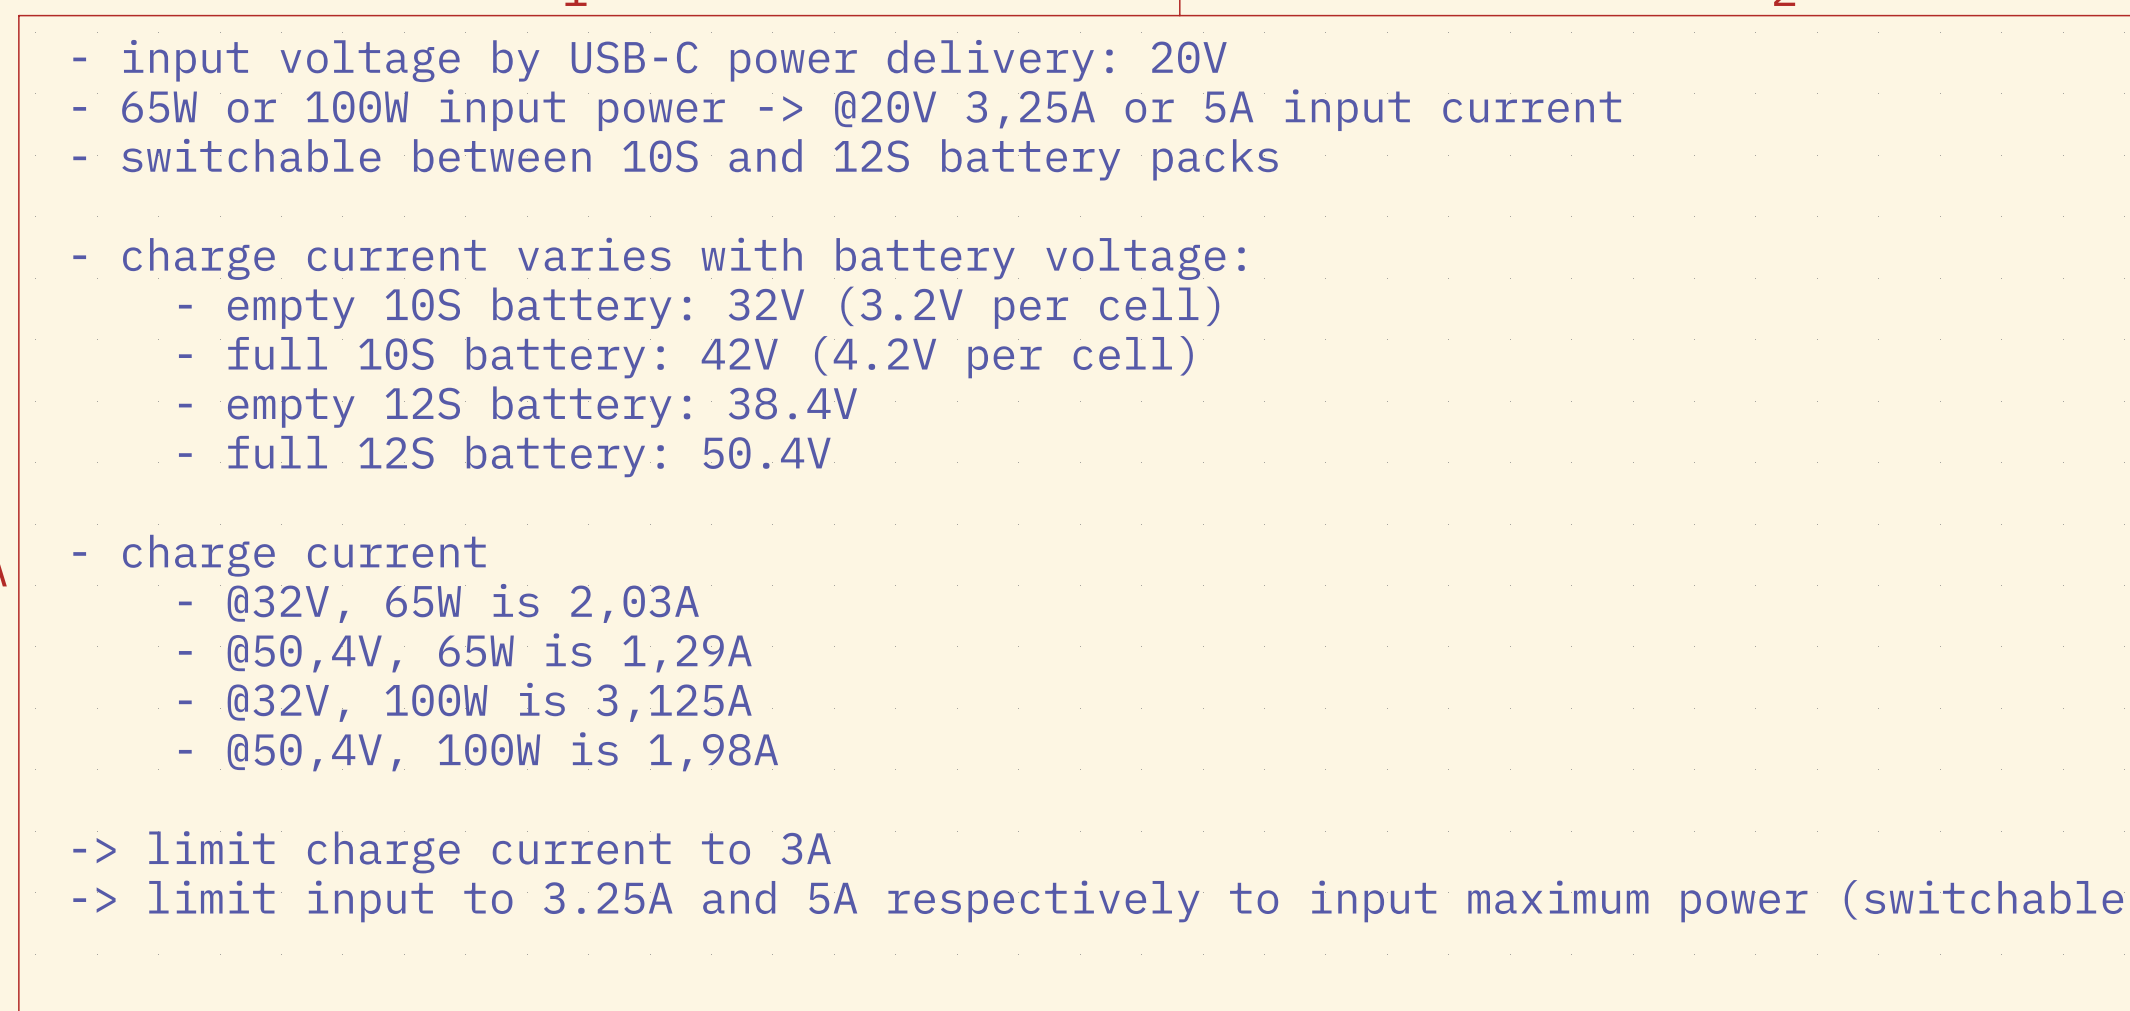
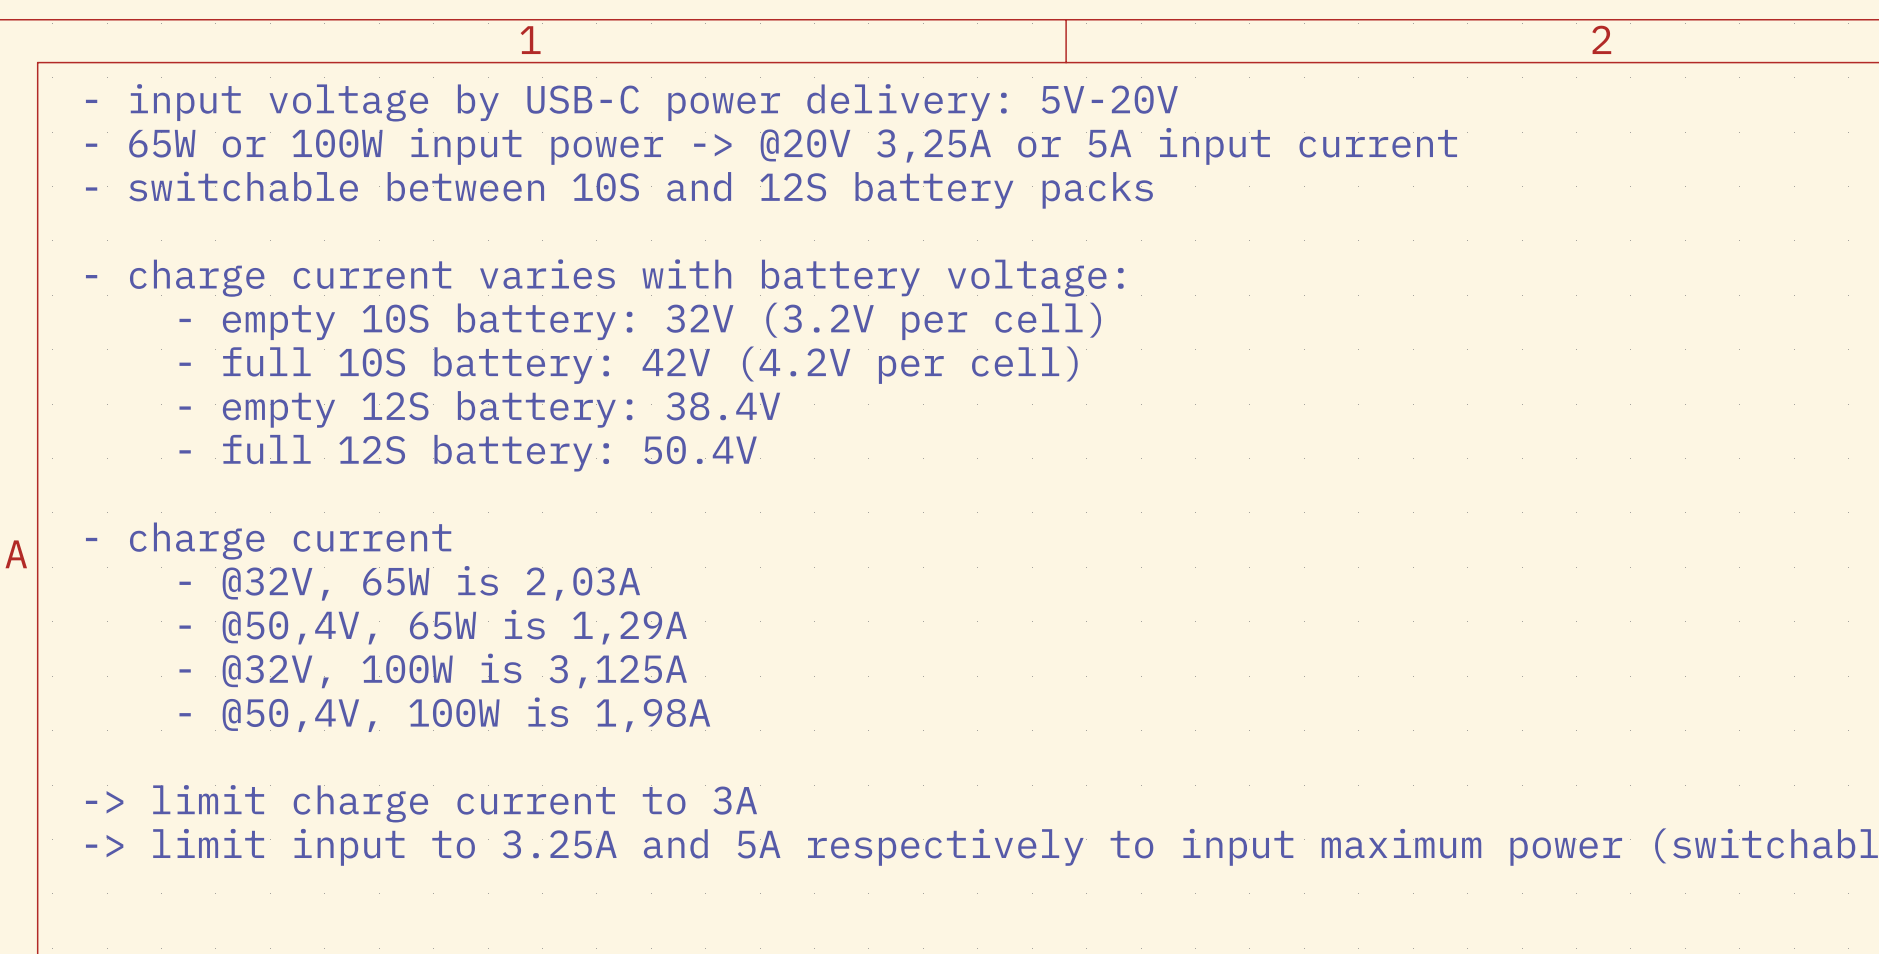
text: - input voltage by USB-C power delivery: 20V (650, 61) -> - input voltage by USB-C power delivery: 5V-20V (631, 102)

